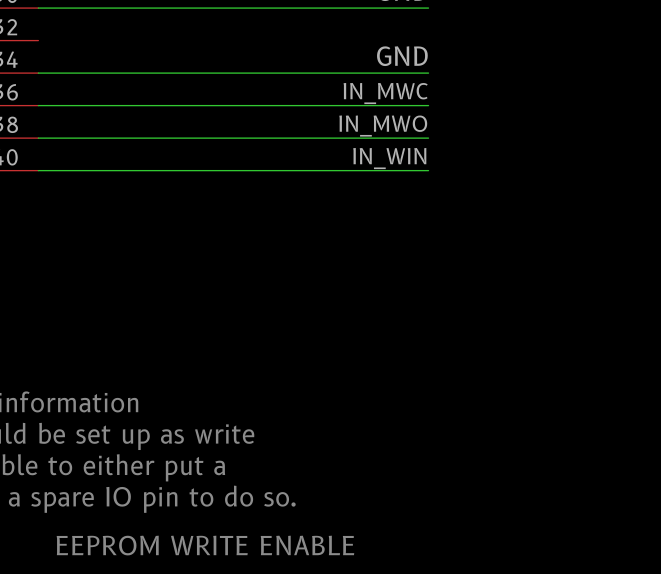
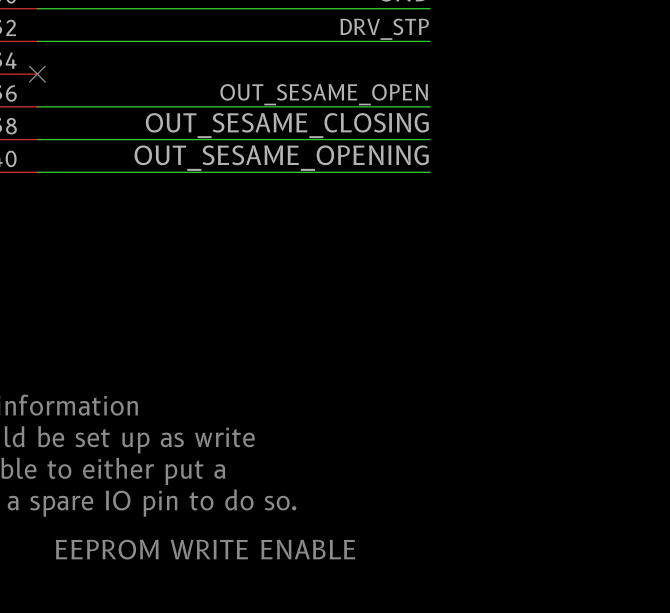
label: none -> DRV_STP (384, 29)
label: GND (402, 56) -> none
wire: (38, 73) (428, 73) -> (37, 41) (430, 41)
no-connect mark: none -> (37, 74)
label: IN_MWC (385, 93) -> OUT_SESAME_OPEN (324, 94)
label: IN_MWO (383, 126) -> OUT_SESAME_CLOSING (287, 125)
label: IN_WIN (389, 158) -> OUT_SESAME_OPENING (281, 158)

